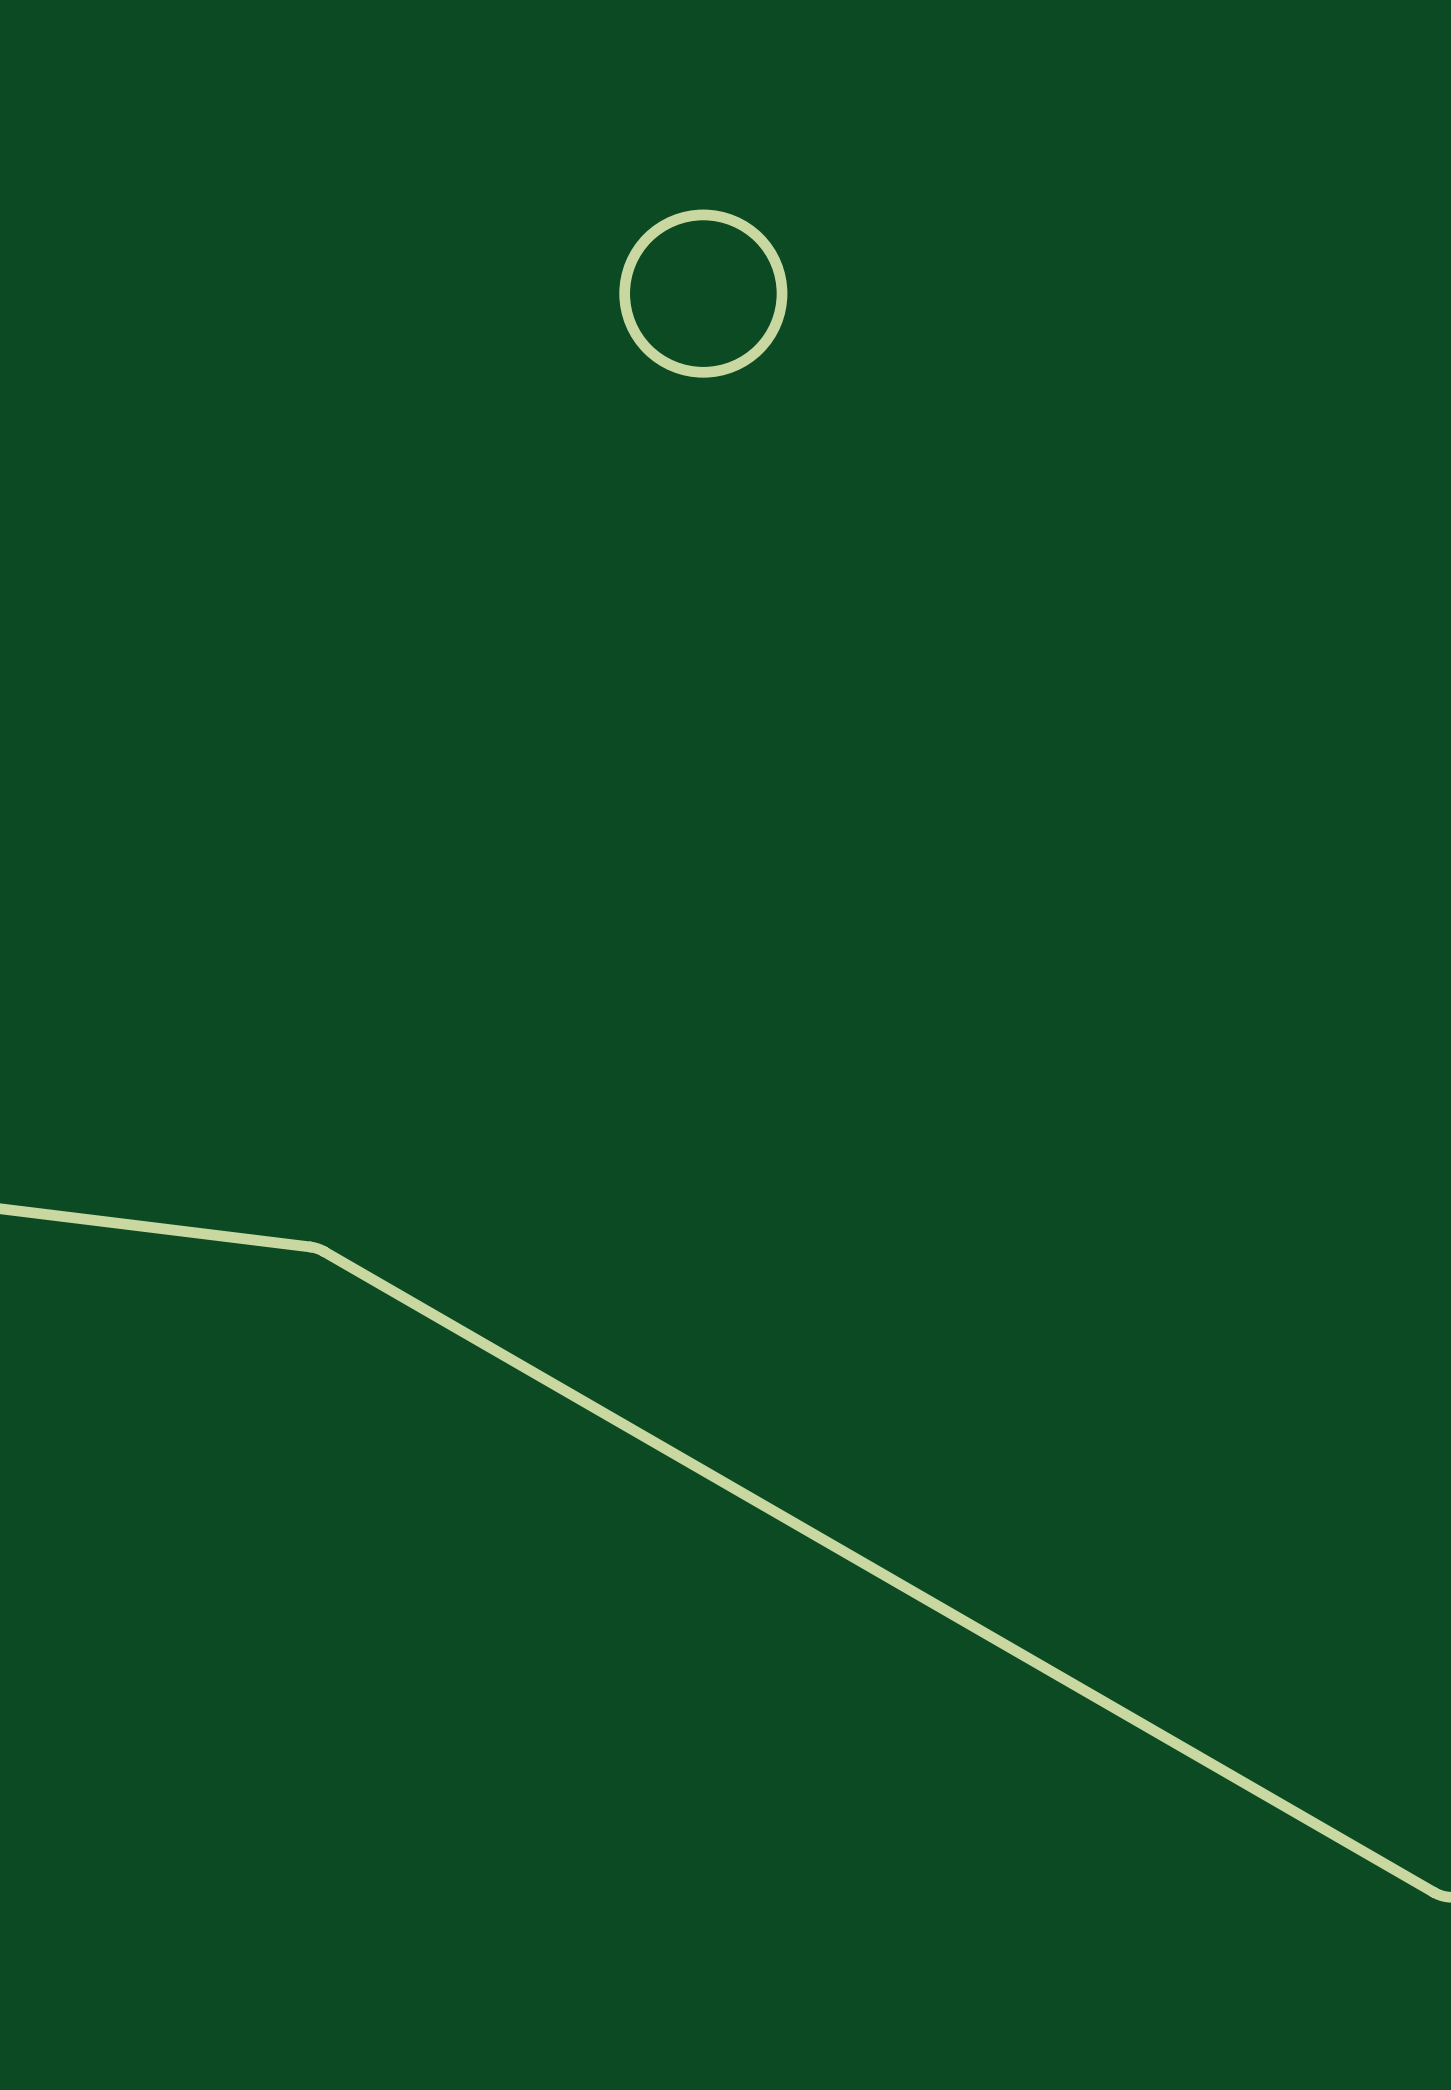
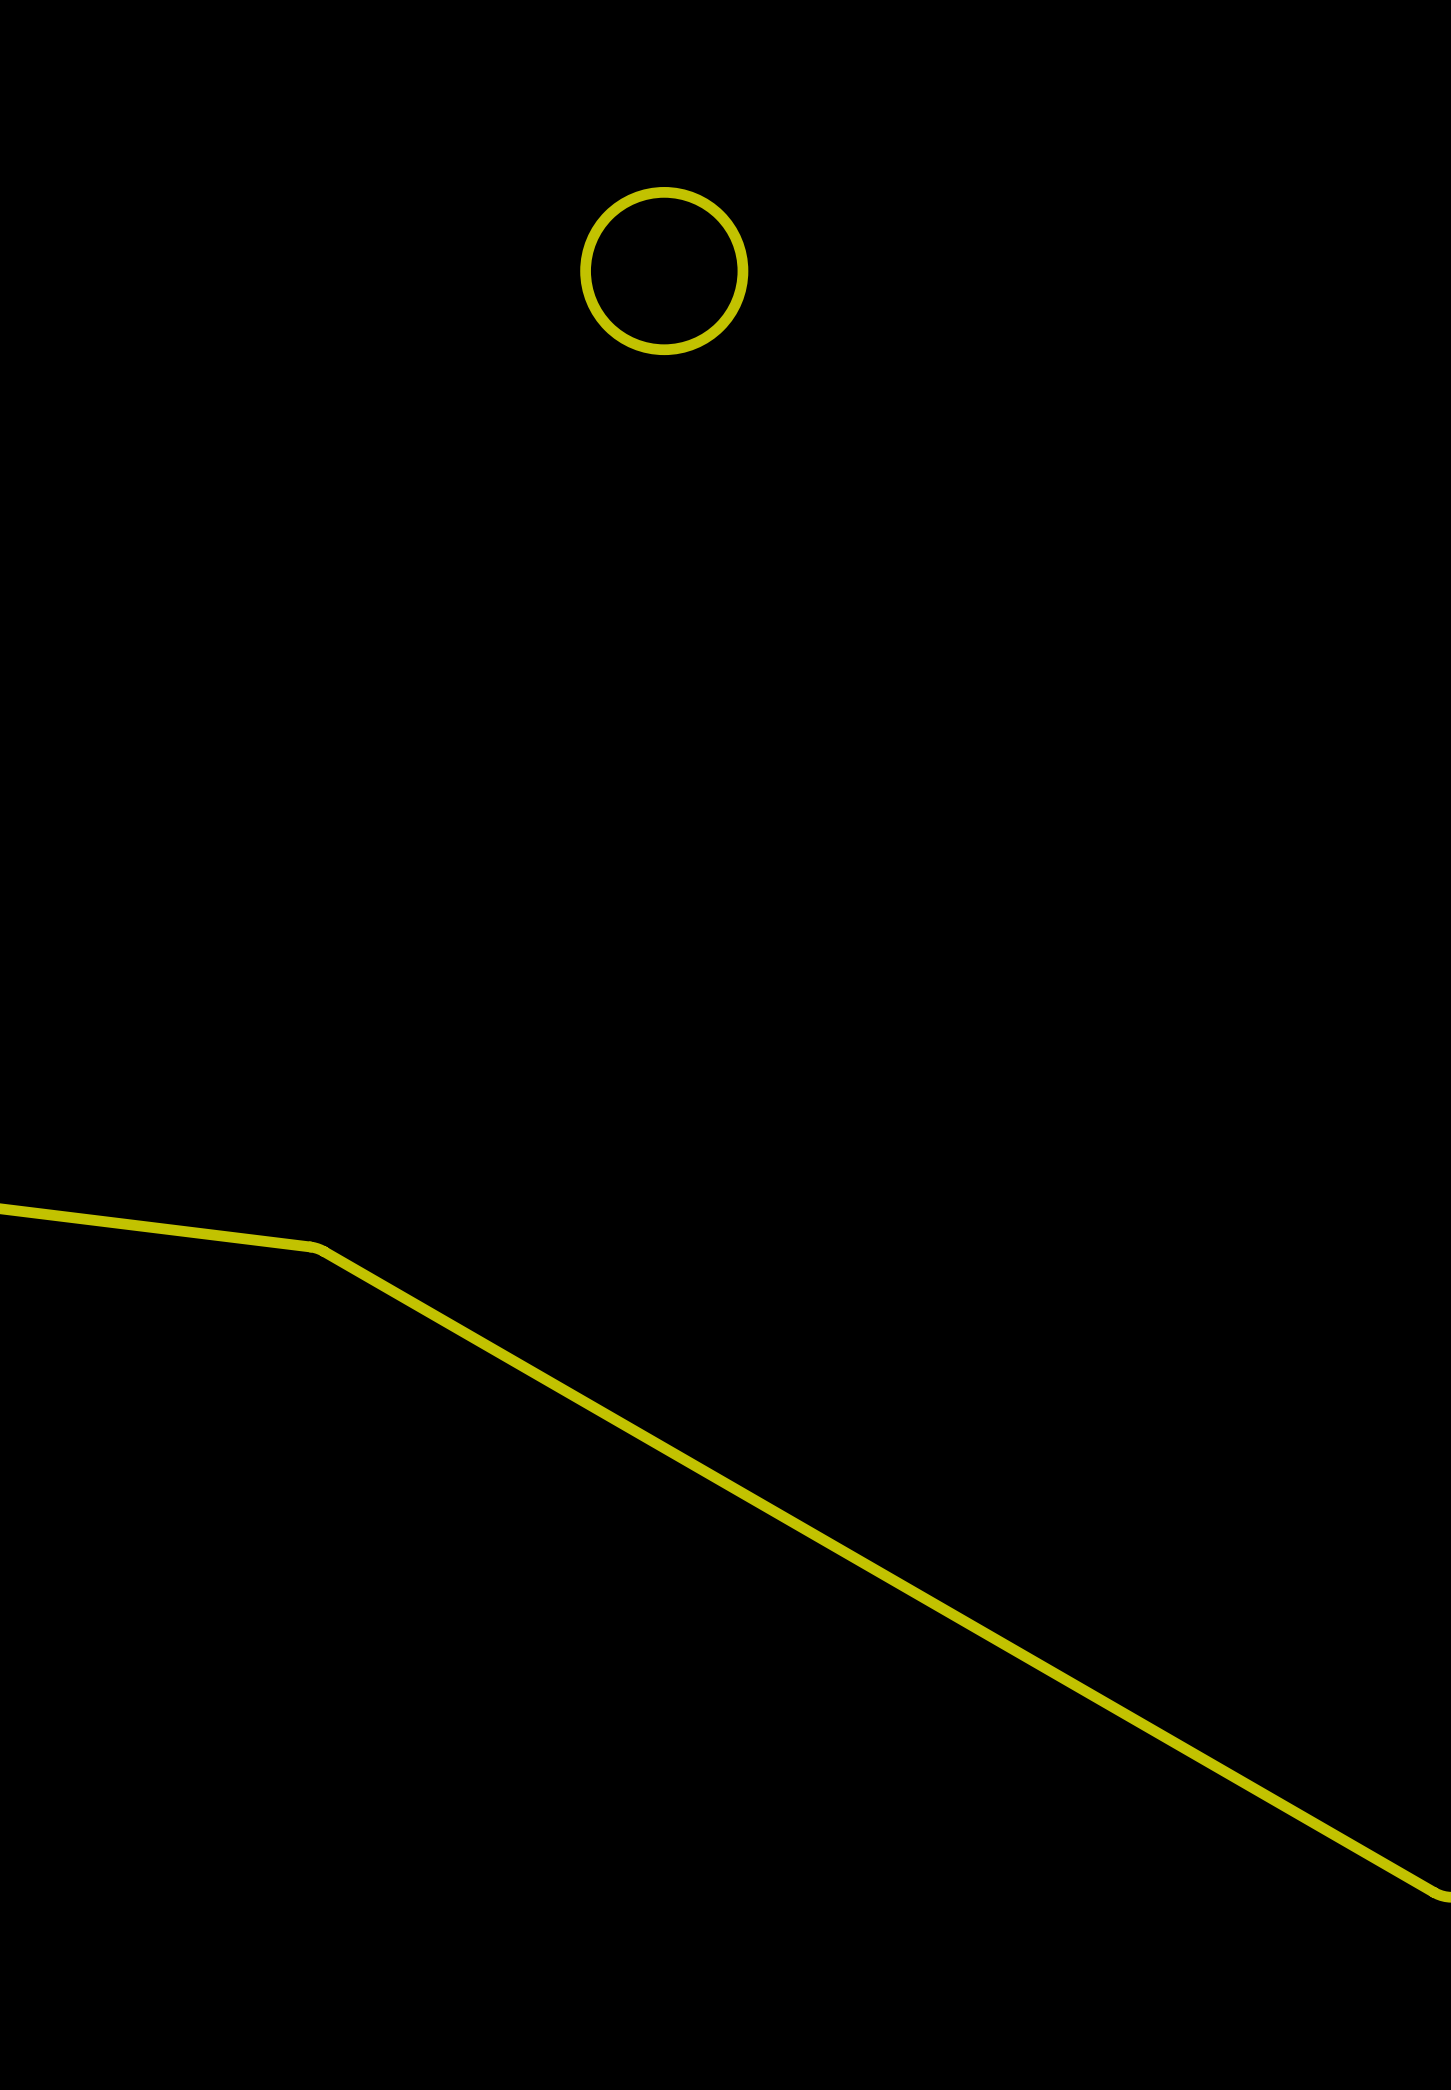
round board edge position: (703, 293) -> (664, 271)

